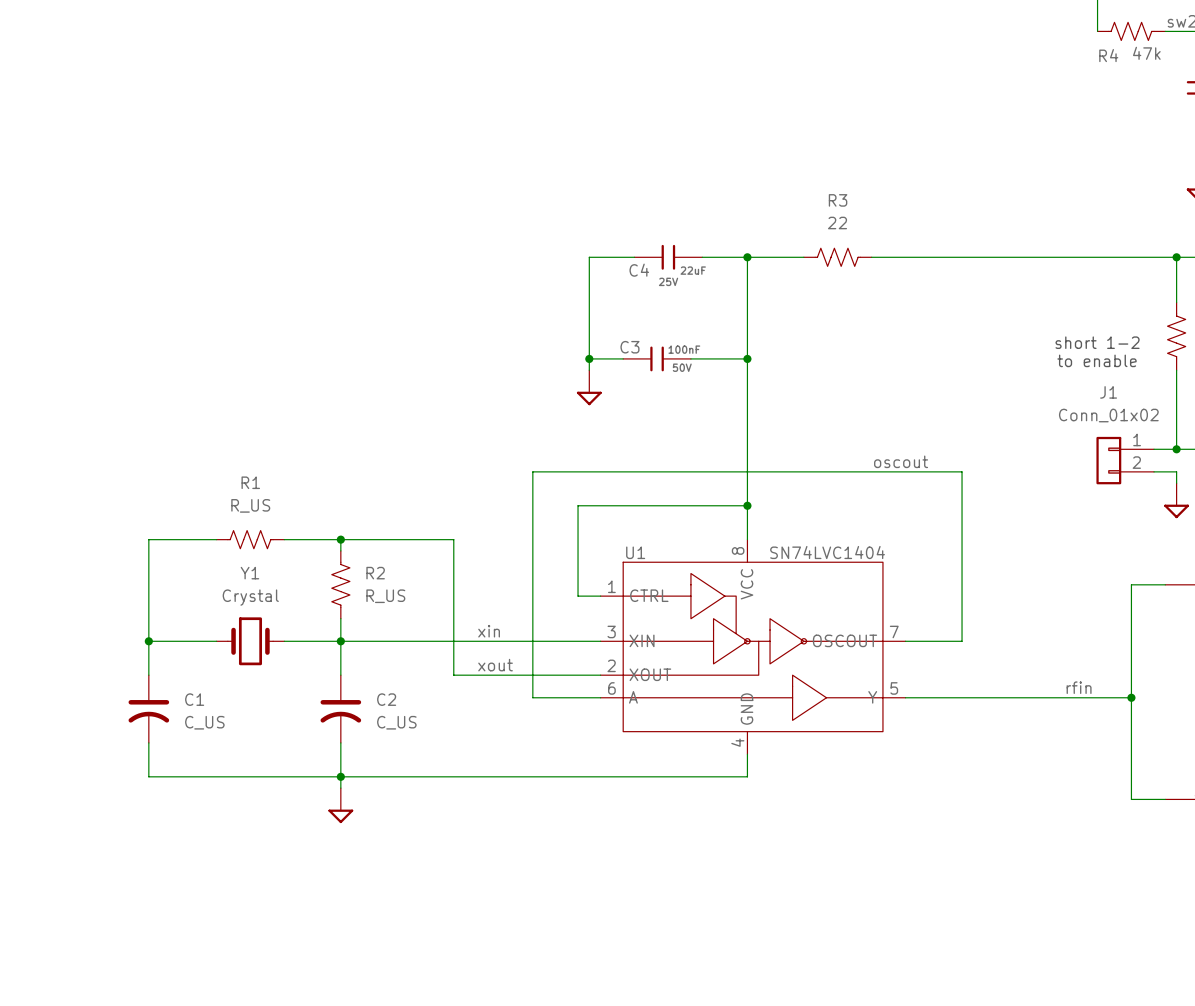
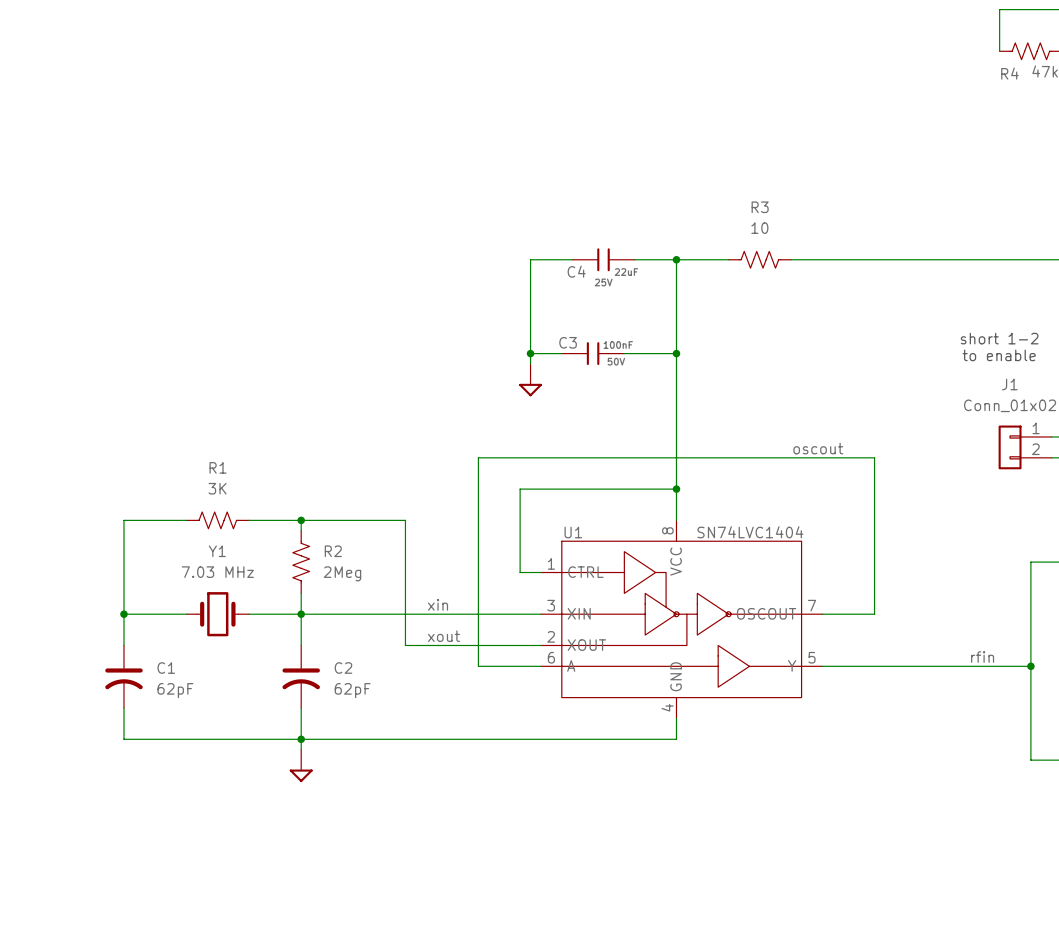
R3 value: 22 (837, 222) -> 10 (759, 228)
R1 value: R_US (250, 505) -> 3K (217, 488)
R2 value: R_US (385, 596) -> 2Meg (342, 573)
Y1 value: Crystal (250, 597) -> 7.03 MHz (217, 572)
C1 value: C_US (204, 722) -> 62pF (175, 690)
C2 value: C_US (396, 722) -> 62pF (352, 690)

